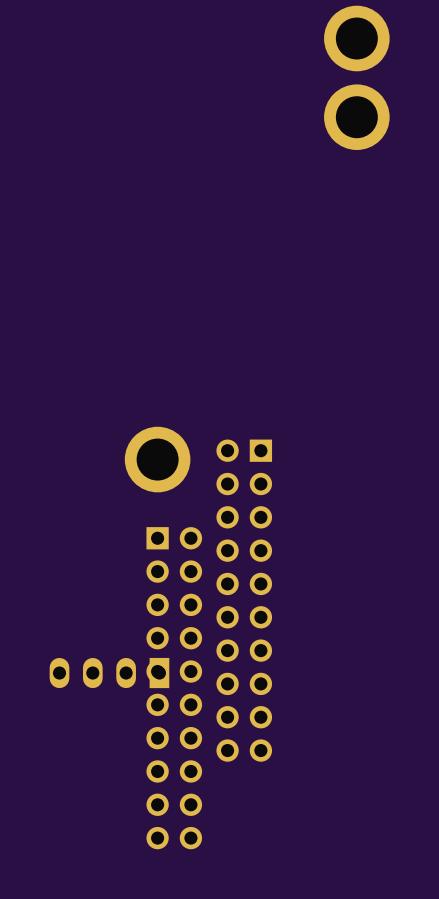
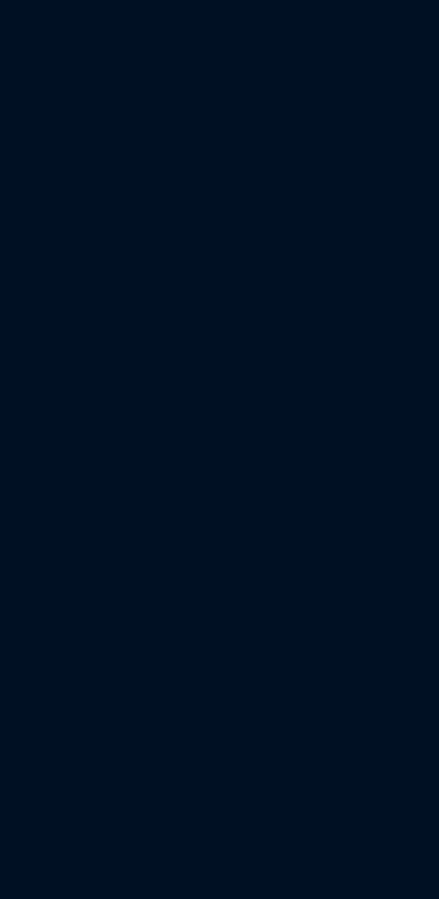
part: (356, 38) -> none
part: (356, 117) -> none
part: (157, 459) -> none
part: (244, 600) -> none
part: (109, 673) -> none
part: (174, 688) -> none

